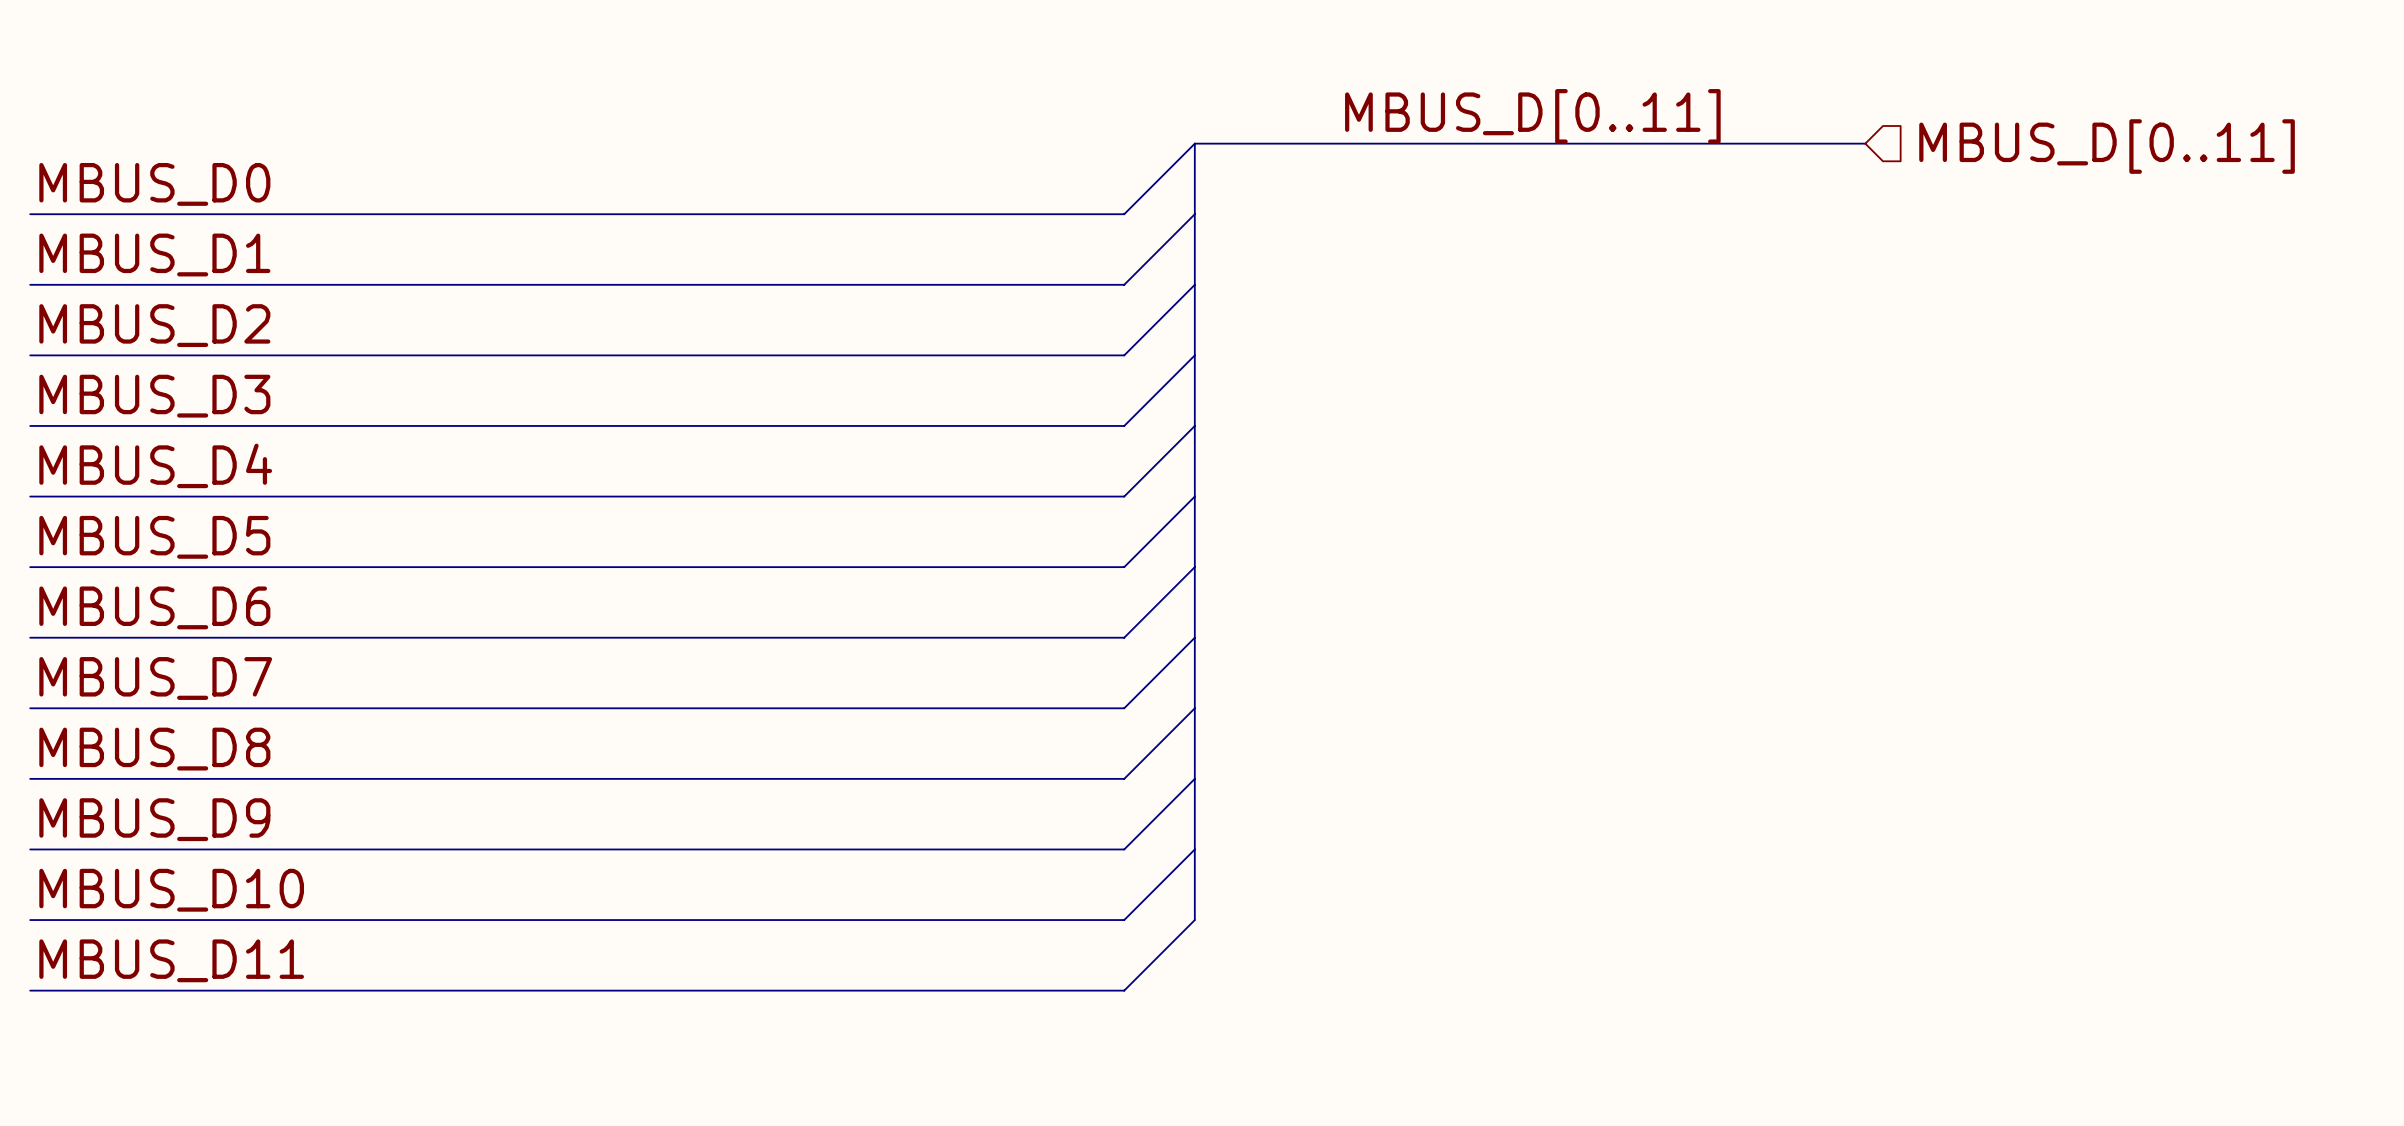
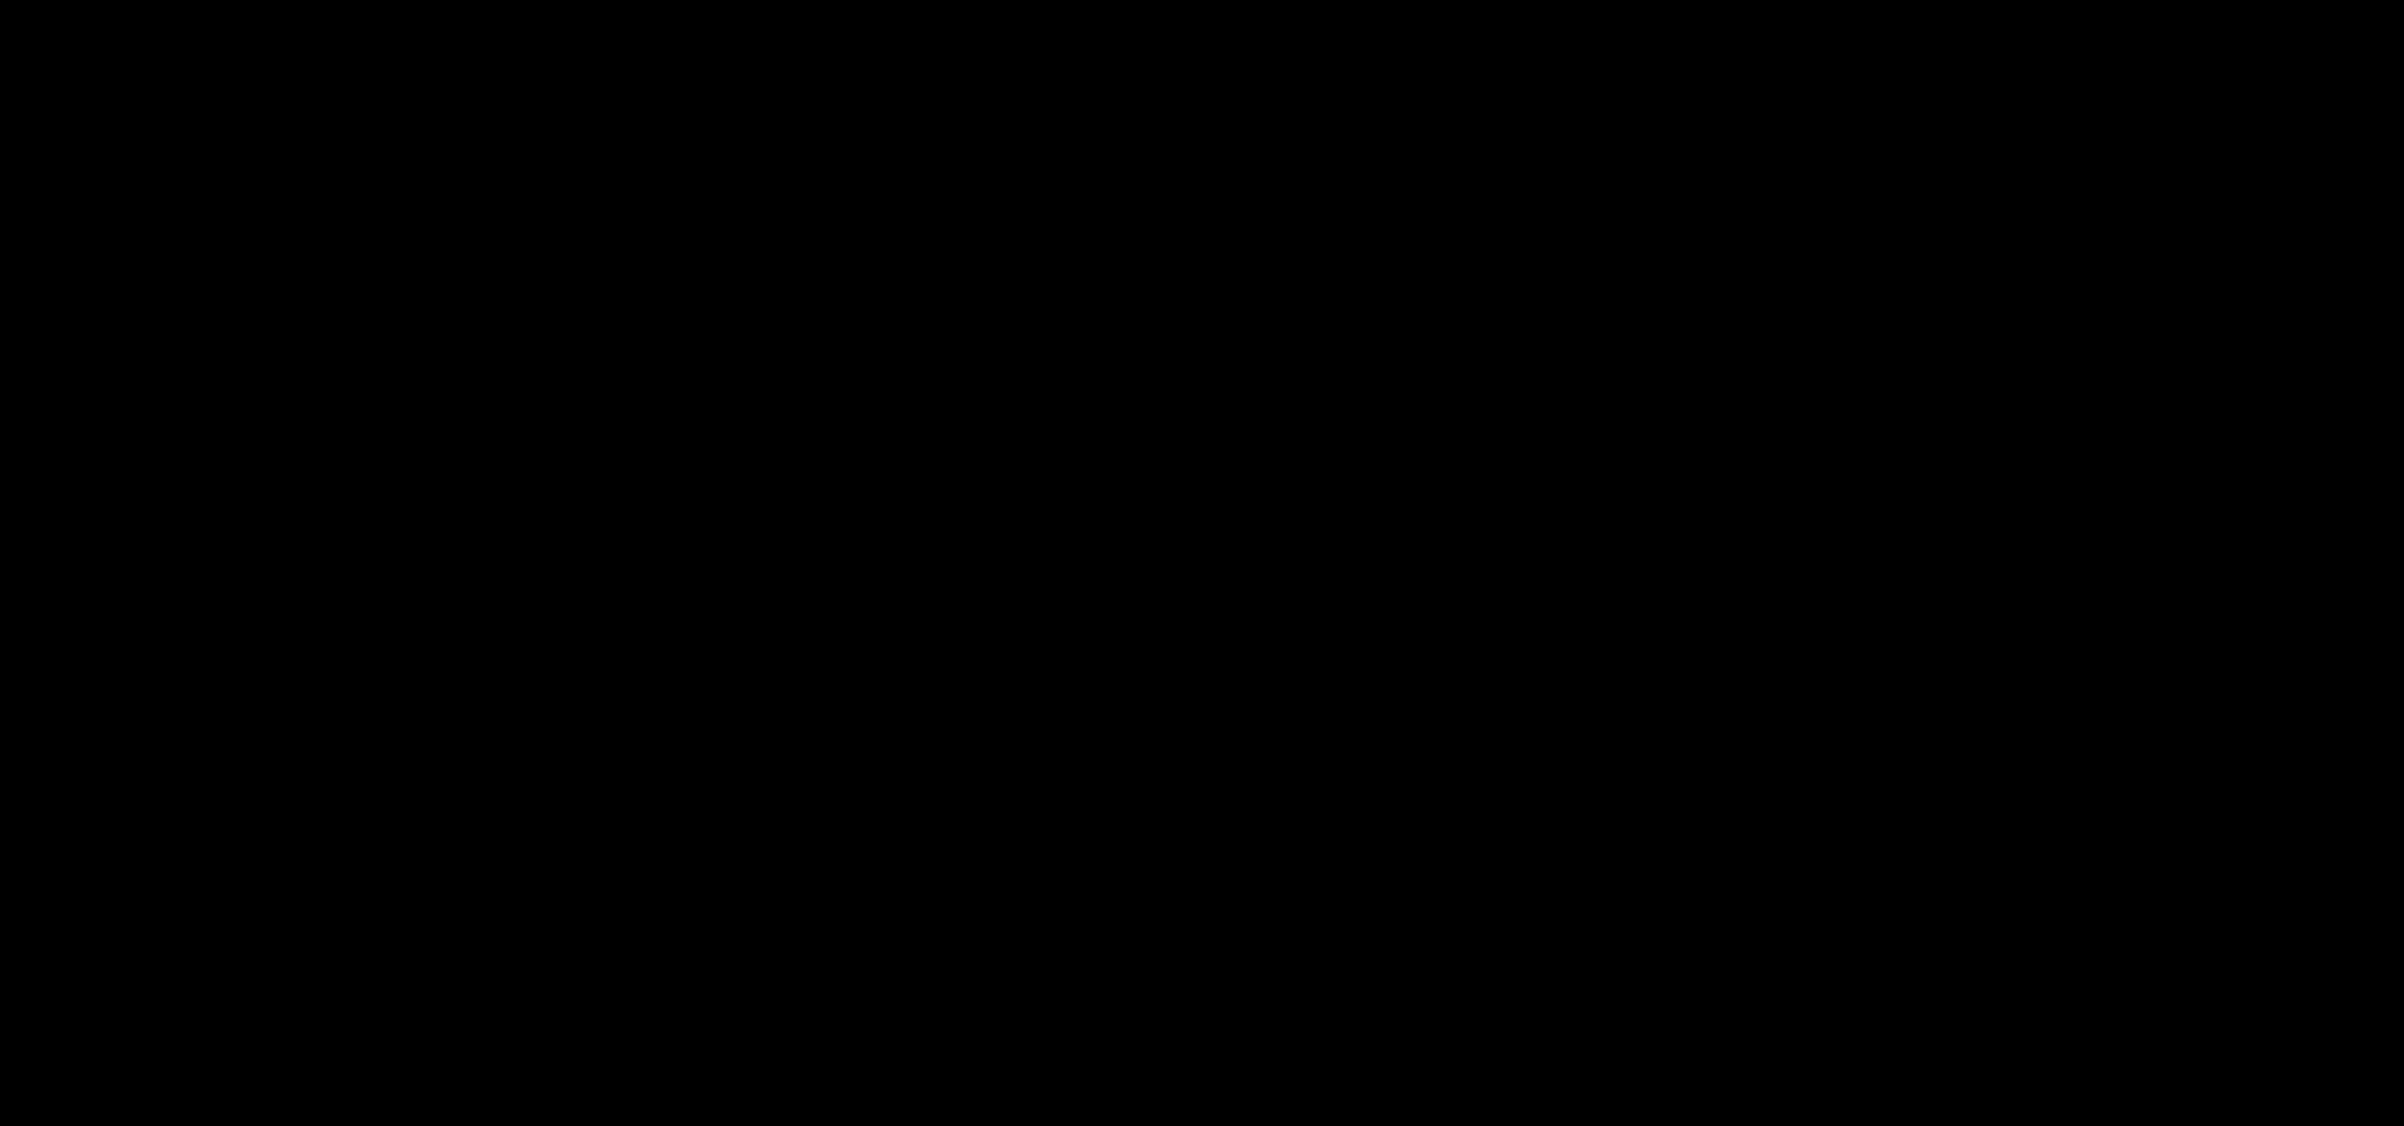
label: MBUS_D[0..11] (1532, 116) -> none
wire: (1194, 143) (1124, 214) (30, 214) -> none
bus: (1865, 143) (1194, 143) (1194, 920) -> none
hierarchical label: MBUS_D[0..11] (2107, 146) -> none
label: MBUS_D0 (154, 184) -> none
wire: (1194, 214) (1124, 284) (30, 284) -> none
label: MBUS_D1 (154, 255) -> none
wire: (1194, 284) (1124, 355) (30, 355) -> none
label: MBUS_D2 (154, 325) -> none
wire: (1194, 355) (1124, 425) (30, 425) -> none
label: MBUS_D3 (154, 396) -> none
wire: (1194, 425) (1124, 496) (30, 496) -> none
label: MBUS_D4 (155, 465) -> none
wire: (1194, 496) (1124, 567) (30, 567) -> none
label: MBUS_D5 (154, 537) -> none
wire: (1194, 567) (1124, 637) (30, 637) -> none
label: MBUS_D6 (154, 607) -> none
wire: (1194, 637) (1124, 708) (30, 708) -> none
label: MBUS_D7 (155, 678) -> none
wire: (1194, 708) (1124, 778) (30, 778) -> none
label: MBUS_D8 (154, 749) -> none
wire: (1194, 778) (1124, 849) (30, 849) -> none
label: MBUS_D9 (154, 819) -> none
wire: (1194, 849) (1124, 920) (30, 920) -> none
label: MBUS_D10 (171, 890) -> none
wire: (1194, 920) (1124, 990) (30, 990) -> none
label: MBUS_D11 (171, 960) -> none

